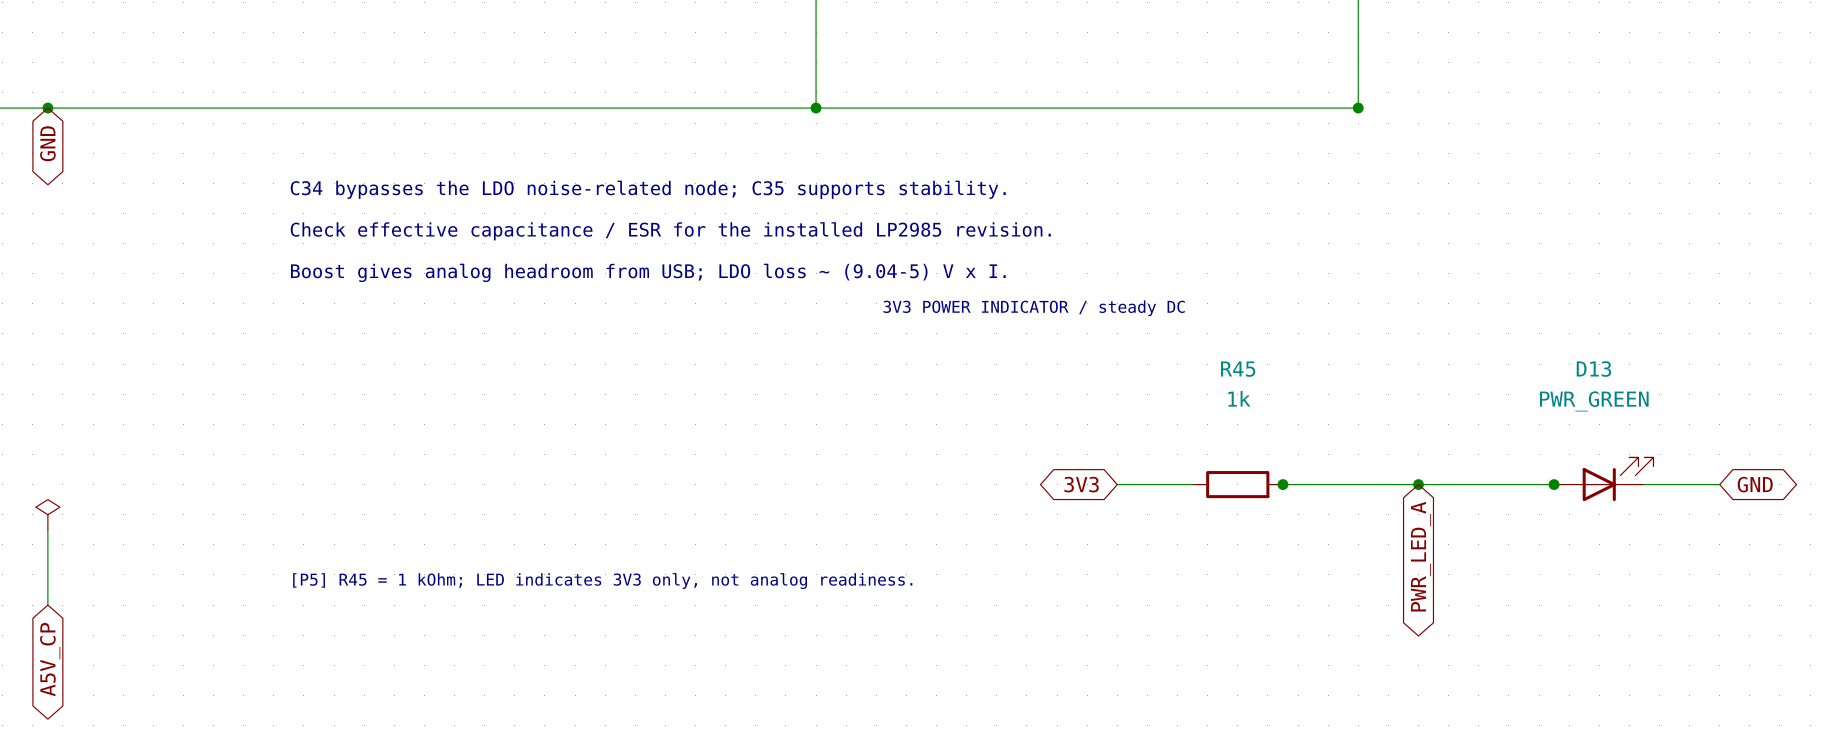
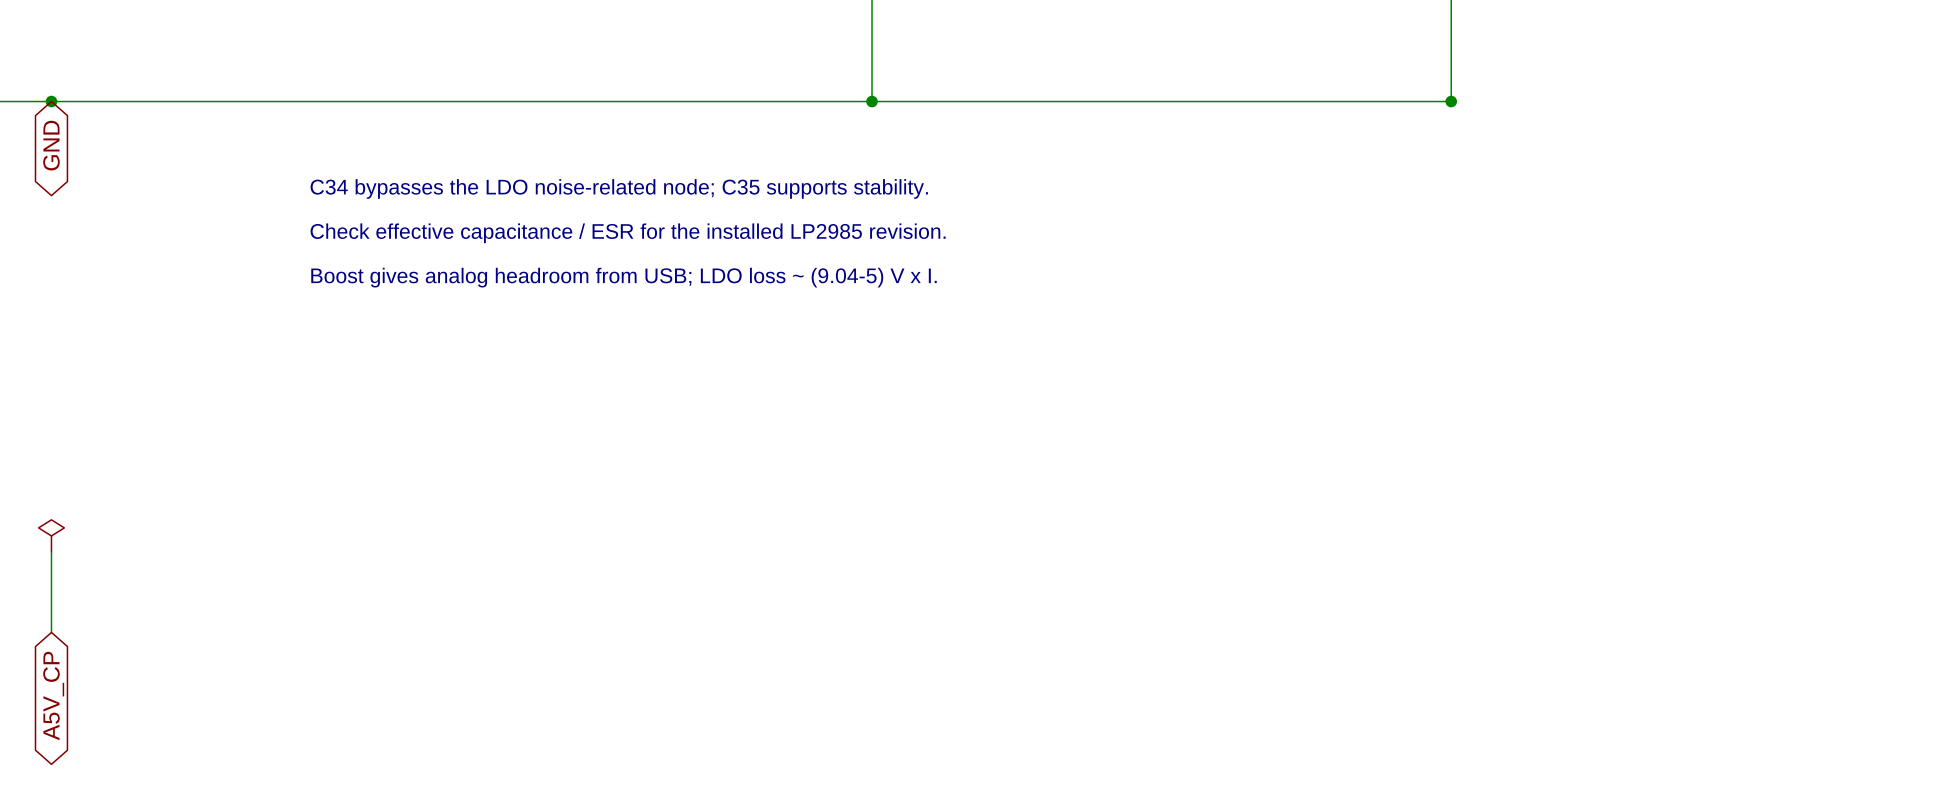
text: 3V3 POWER INDICATOR / steady DC (1034, 308) -> none
D13: PWR_GREEN (1603, 479) -> none
global label: 3V3 (1081, 484) -> none
wire: (1117, 484) (1192, 484) -> none
R45: 1k (1237, 484) -> none
wire: (1282, 484) (1554, 484) -> none
junction: (1282, 484) -> none
junction: (1418, 484) -> none
junction: (1554, 484) -> none
wire: (1644, 484) (1719, 484) -> none
global label: GND (1755, 484) -> none
global label: PWR_LED_A (1420, 556) -> none
text: [P5] R45 = 1 kOhm; LED indicates 3V3 only, not analog readiness. (602, 581) -> none

